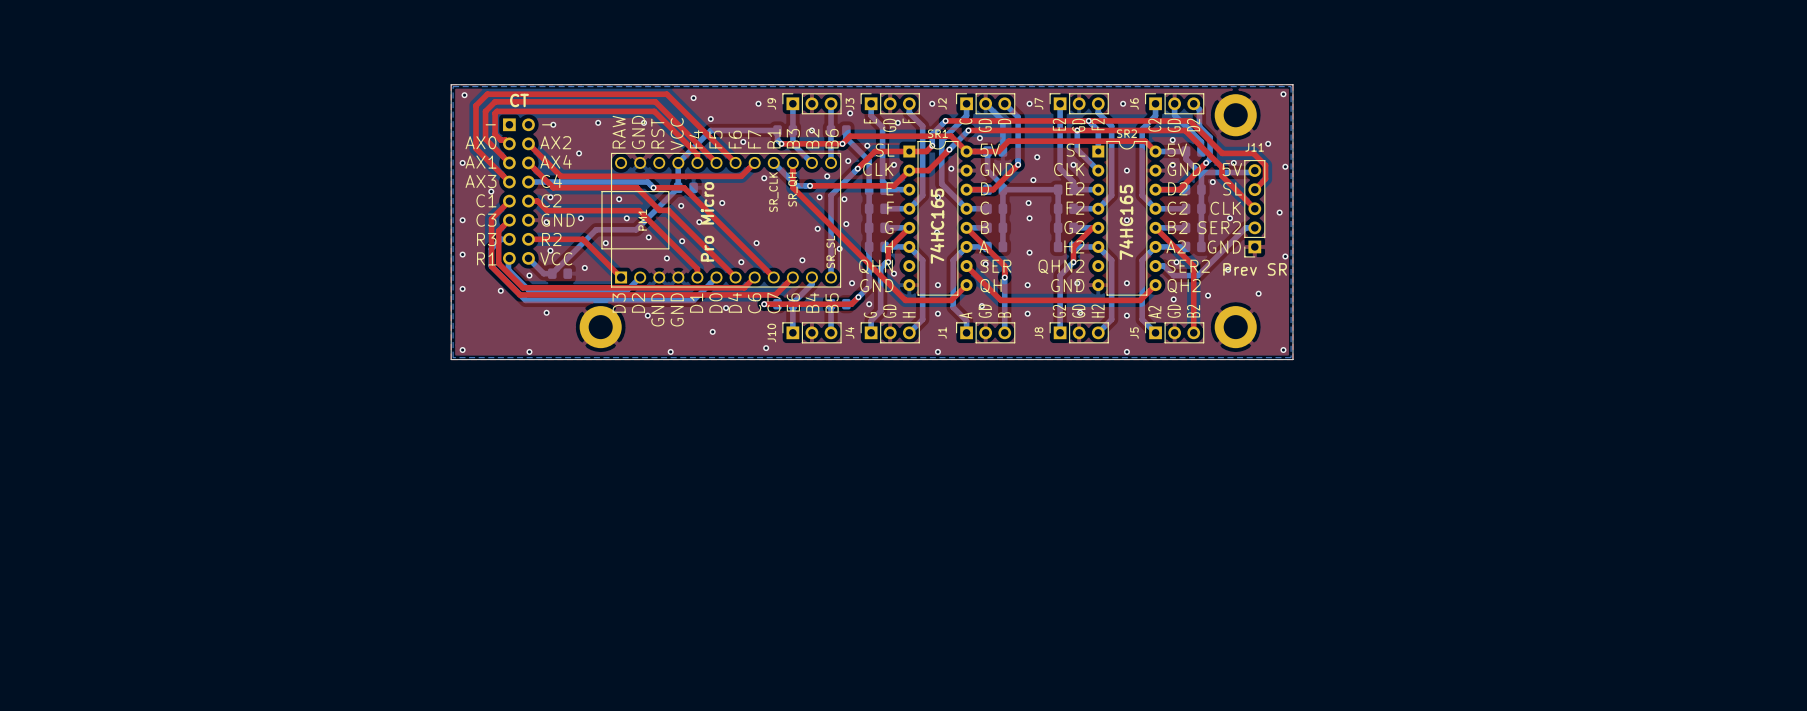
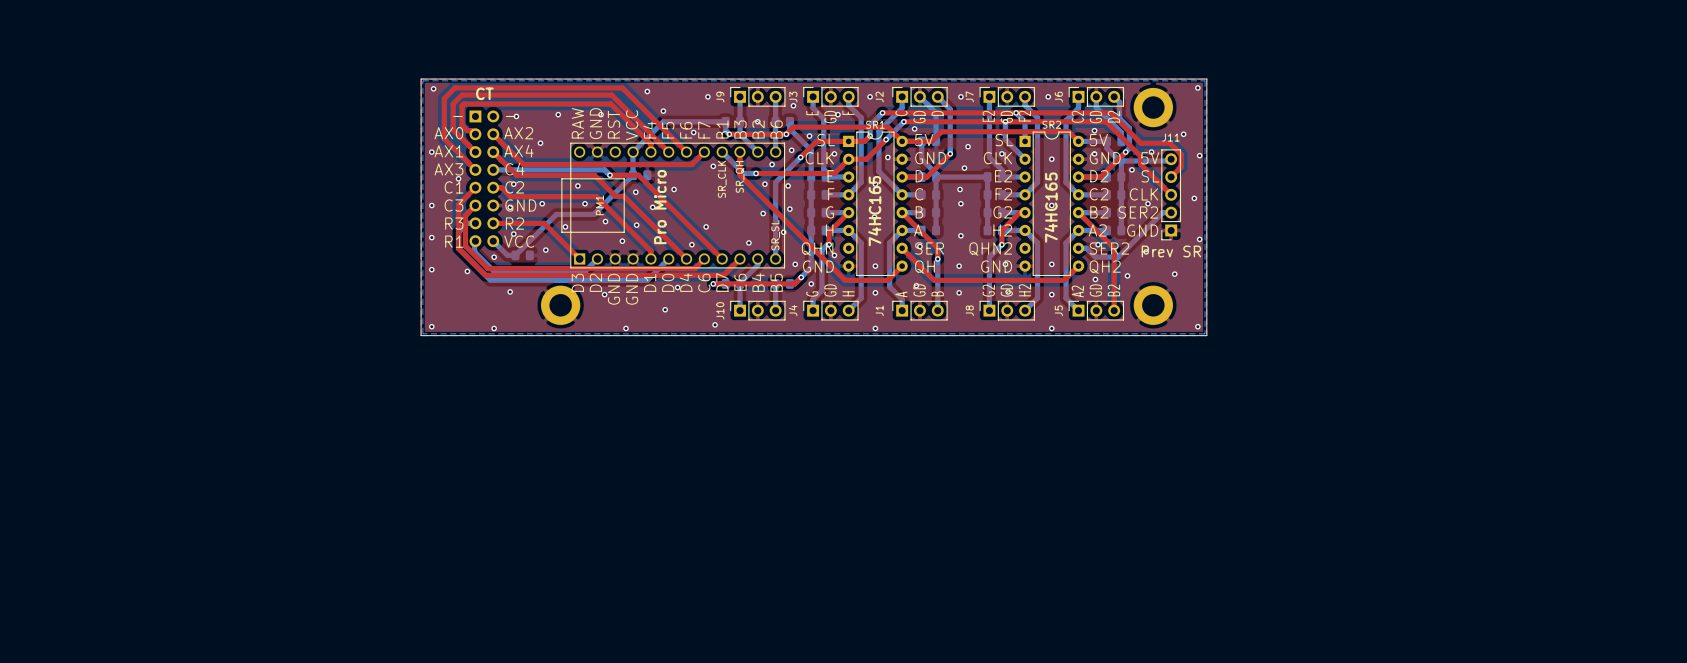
text: C7 (774, 303) -> D7 (722, 282)

